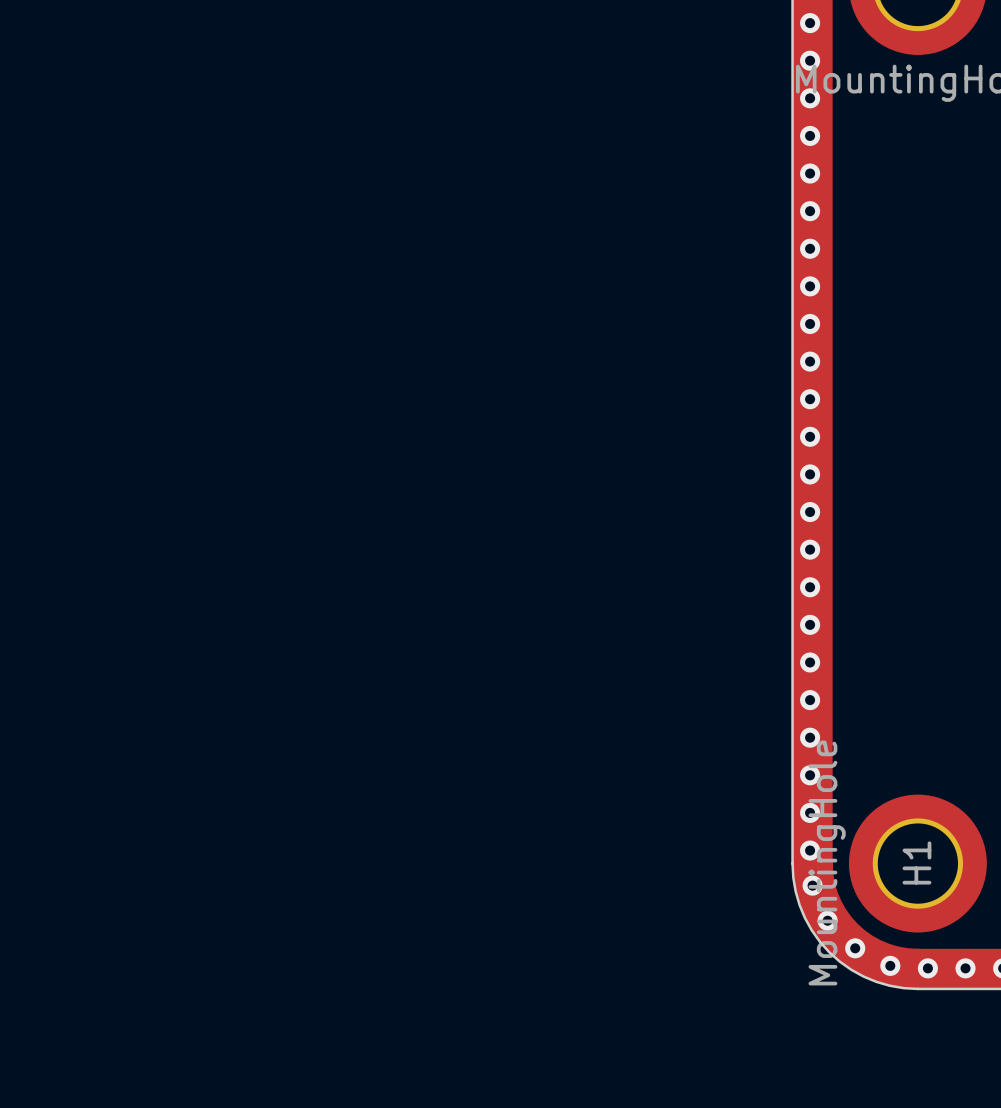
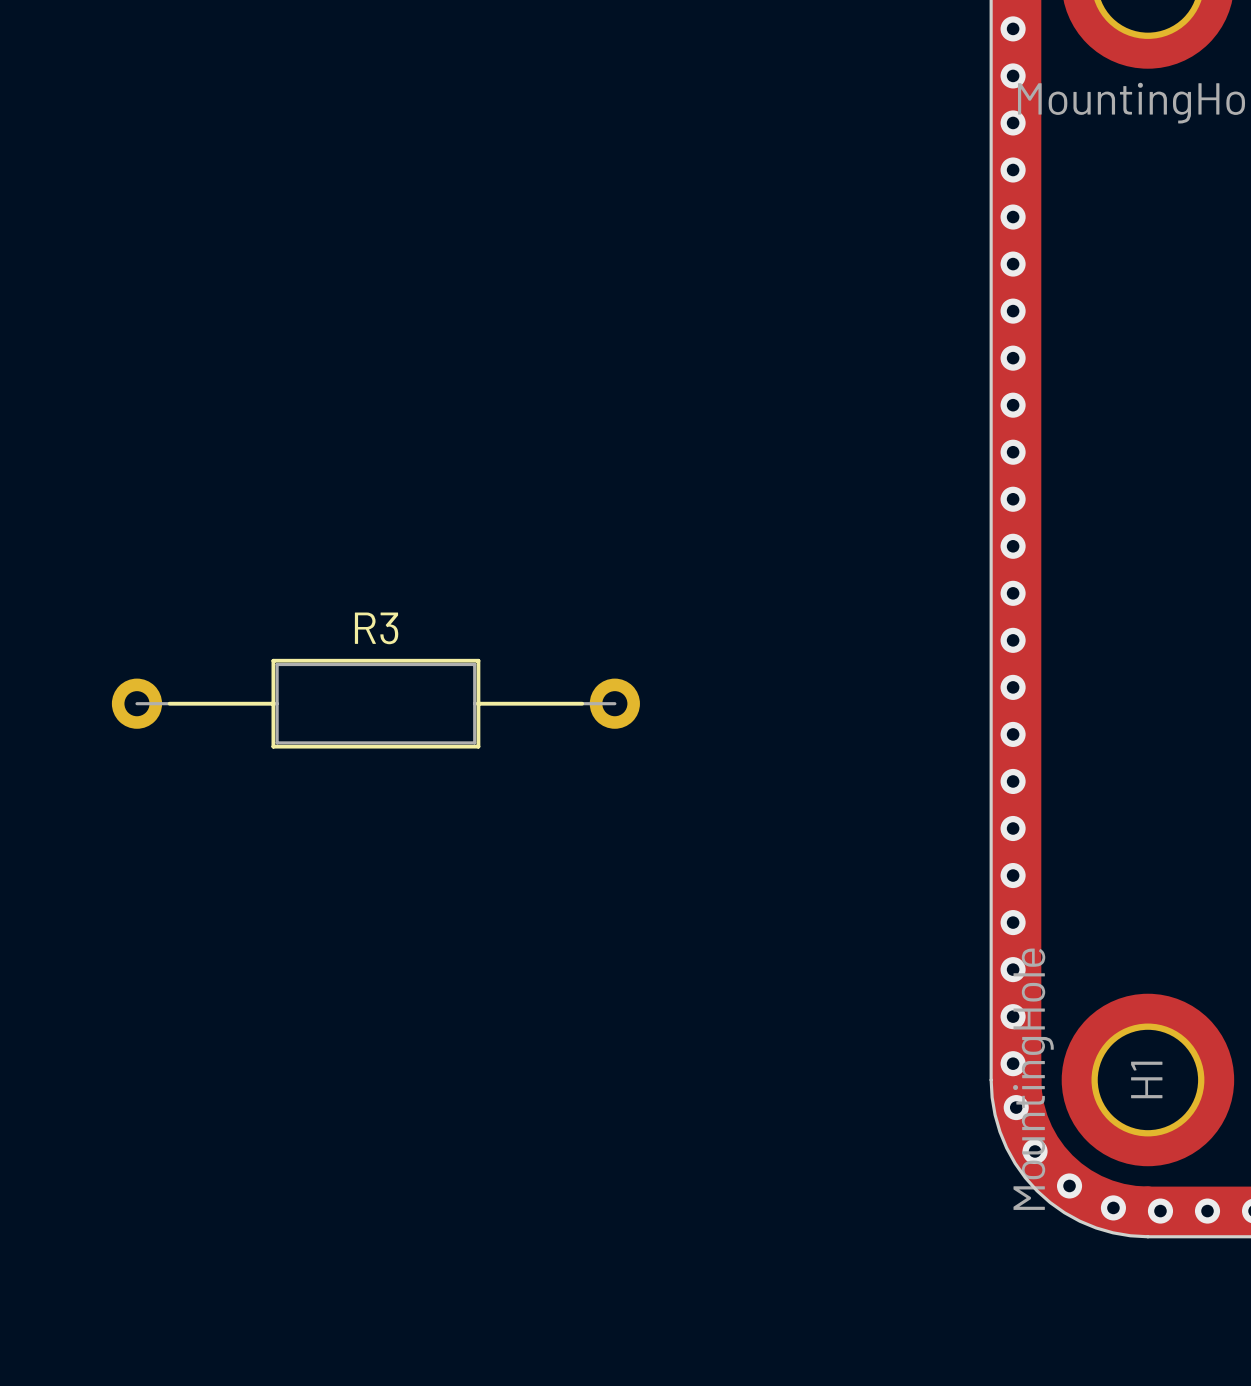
R3: none -> (375, 703)

